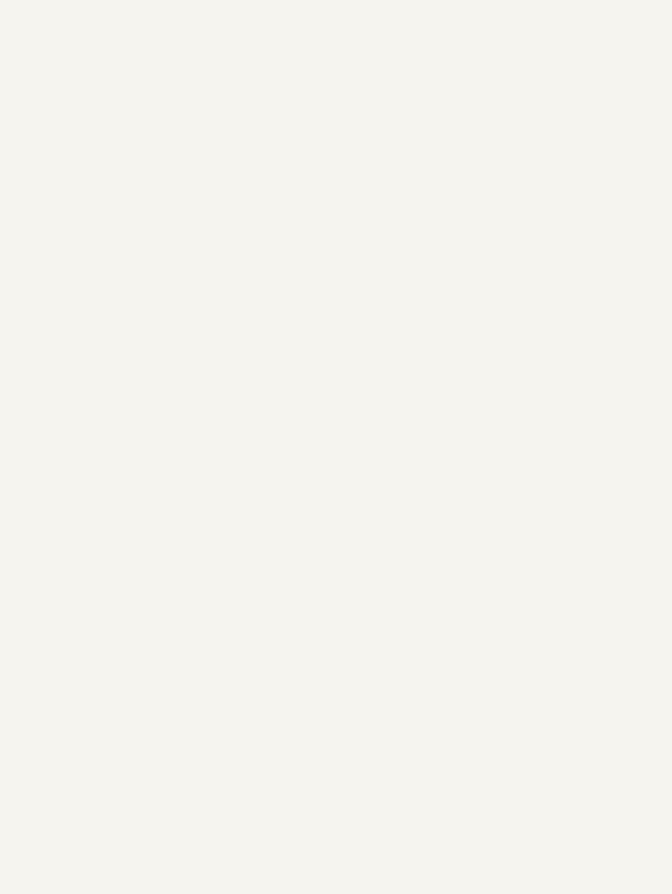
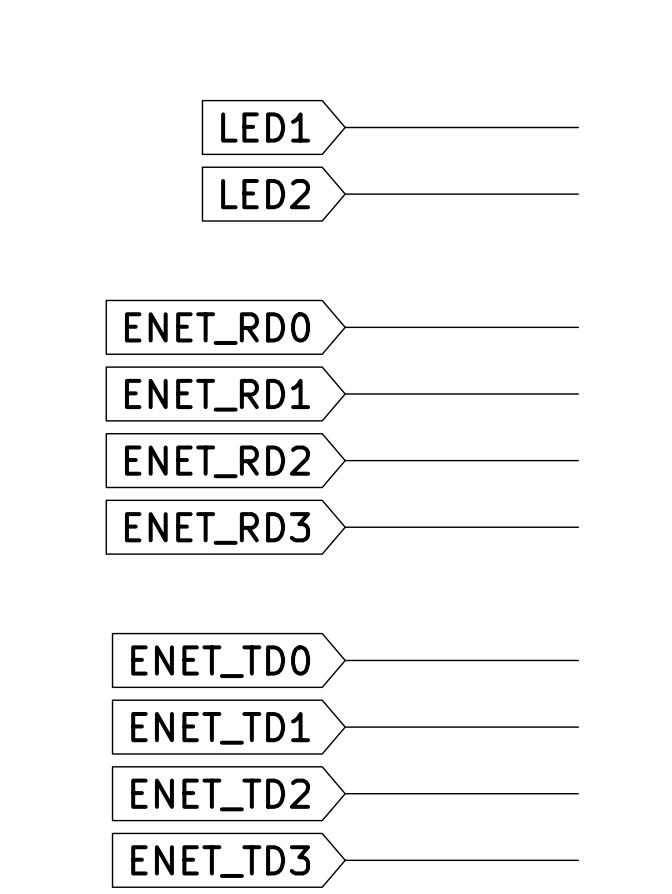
global label: none -> LED1 (265, 127)
wire: none -> (345, 127) (578, 127)
global label: none -> LED2 (265, 194)
wire: none -> (345, 194) (578, 194)
wire: none -> (345, 327) (578, 327)
global label: none -> ENET_RD0 (217, 328)
wire: none -> (345, 393) (578, 393)
global label: none -> ENET_RD1 (217, 395)
wire: none -> (345, 460) (578, 460)
global label: none -> ENET_RD2 (217, 461)
wire: none -> (345, 527) (578, 527)
global label: none -> ENET_RD3 (217, 528)
wire: none -> (345, 660) (578, 660)
global label: none -> ENET_TD0 (220, 661)
wire: none -> (345, 727) (578, 727)
global label: none -> ENET_TD1 (220, 728)
wire: none -> (345, 793) (578, 793)
global label: none -> ENET_TD2 (220, 794)
wire: none -> (345, 860) (578, 860)
global label: none -> ENET_TD3 (220, 861)

